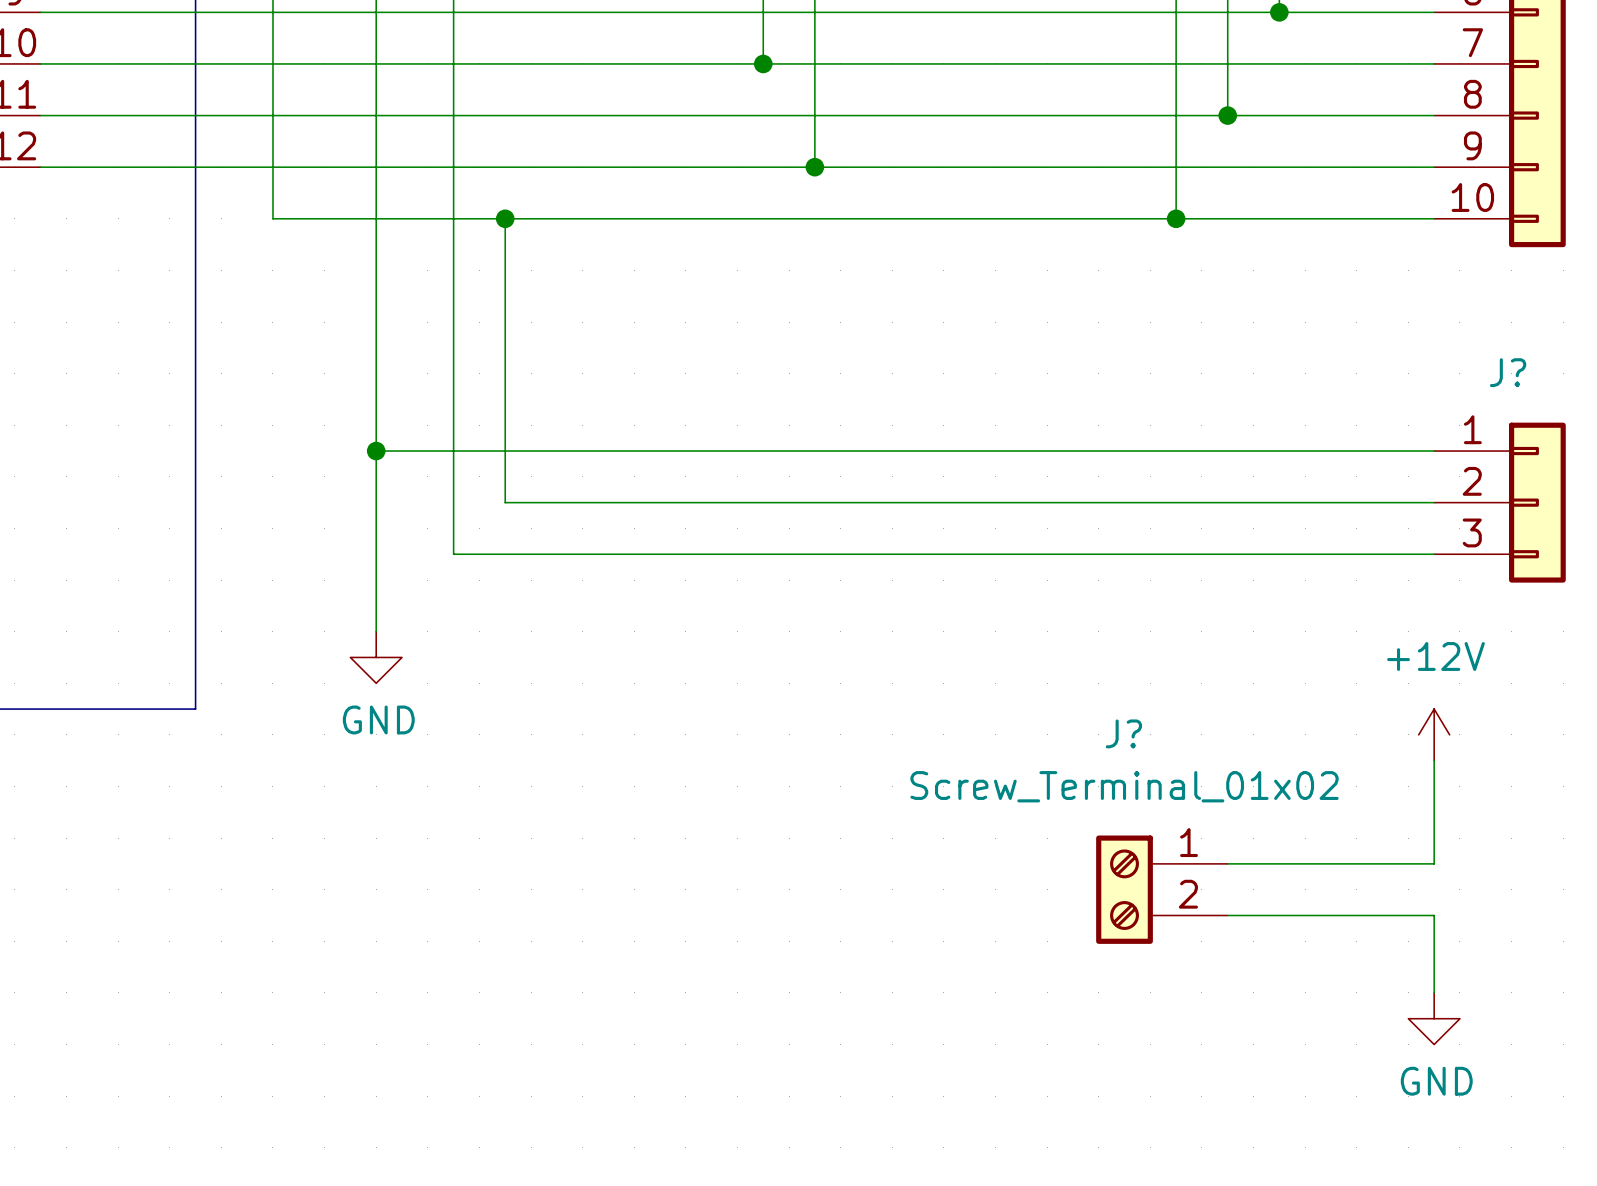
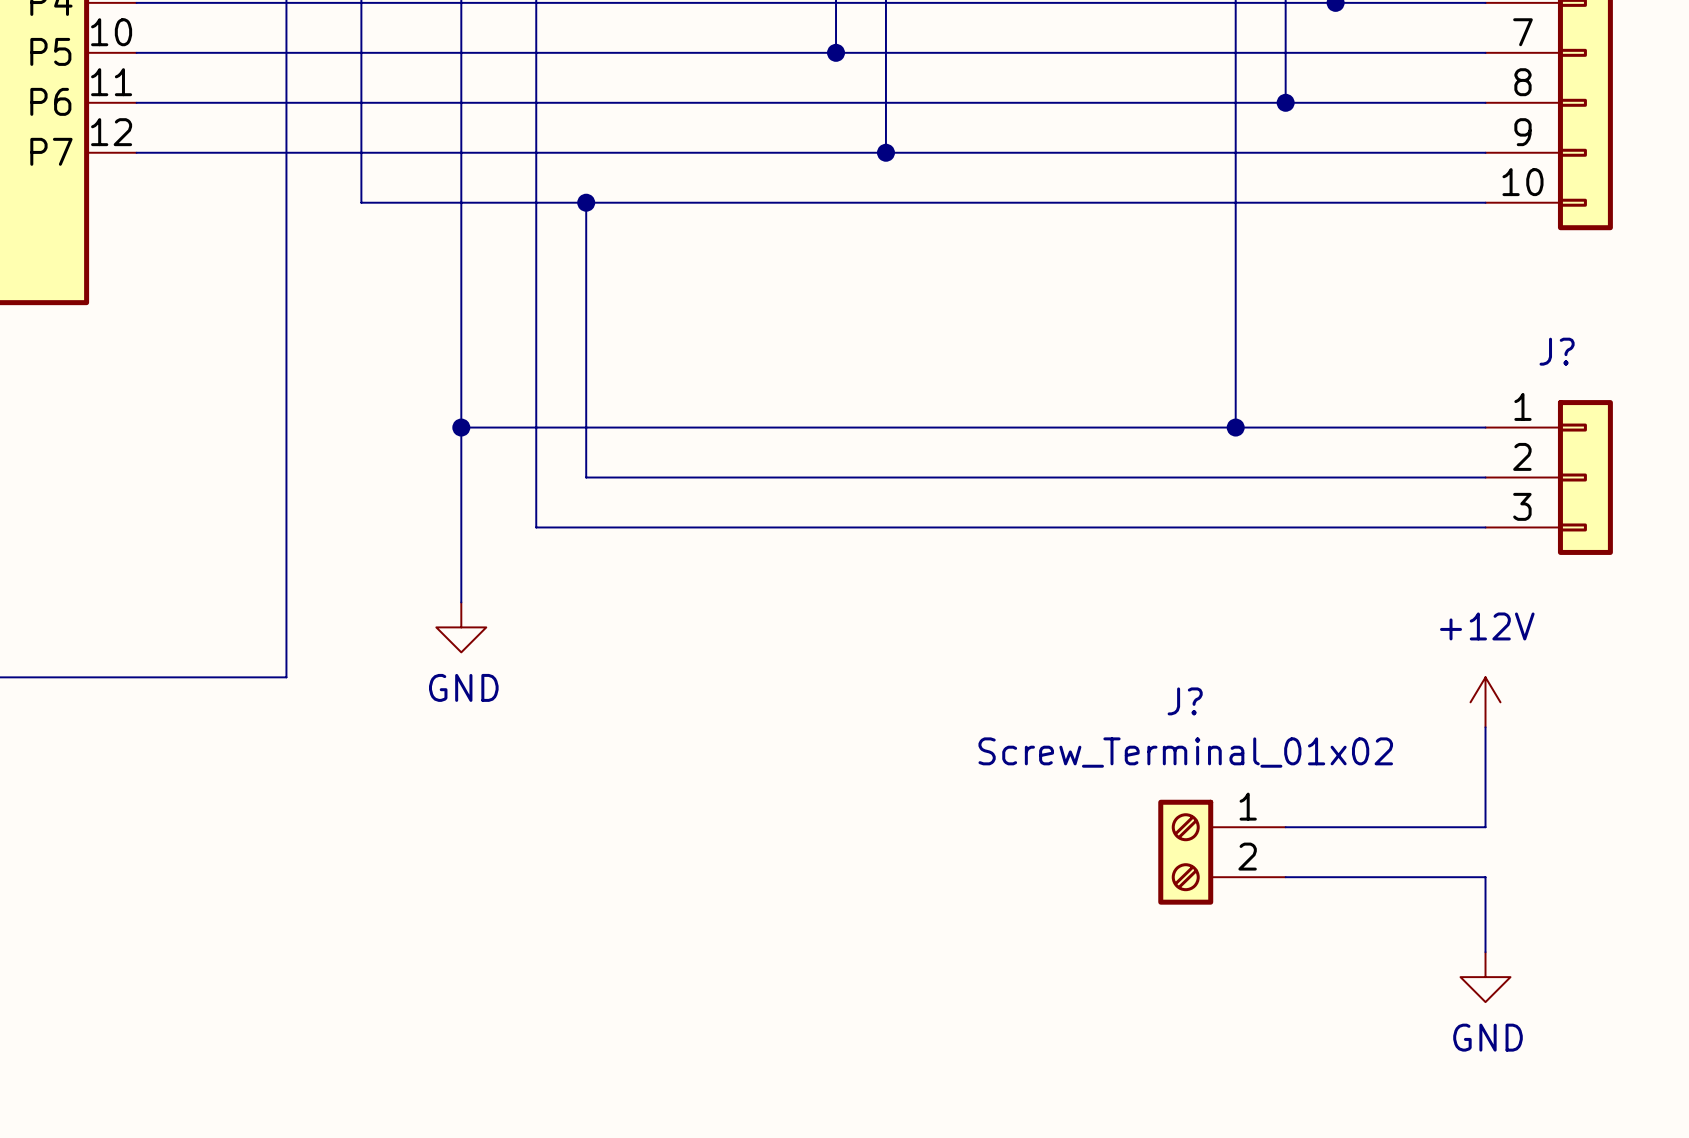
wire: none -> (1235, 202) (1235, 427)
junction: (1176, 218) -> none
junction: none -> (1235, 427)

